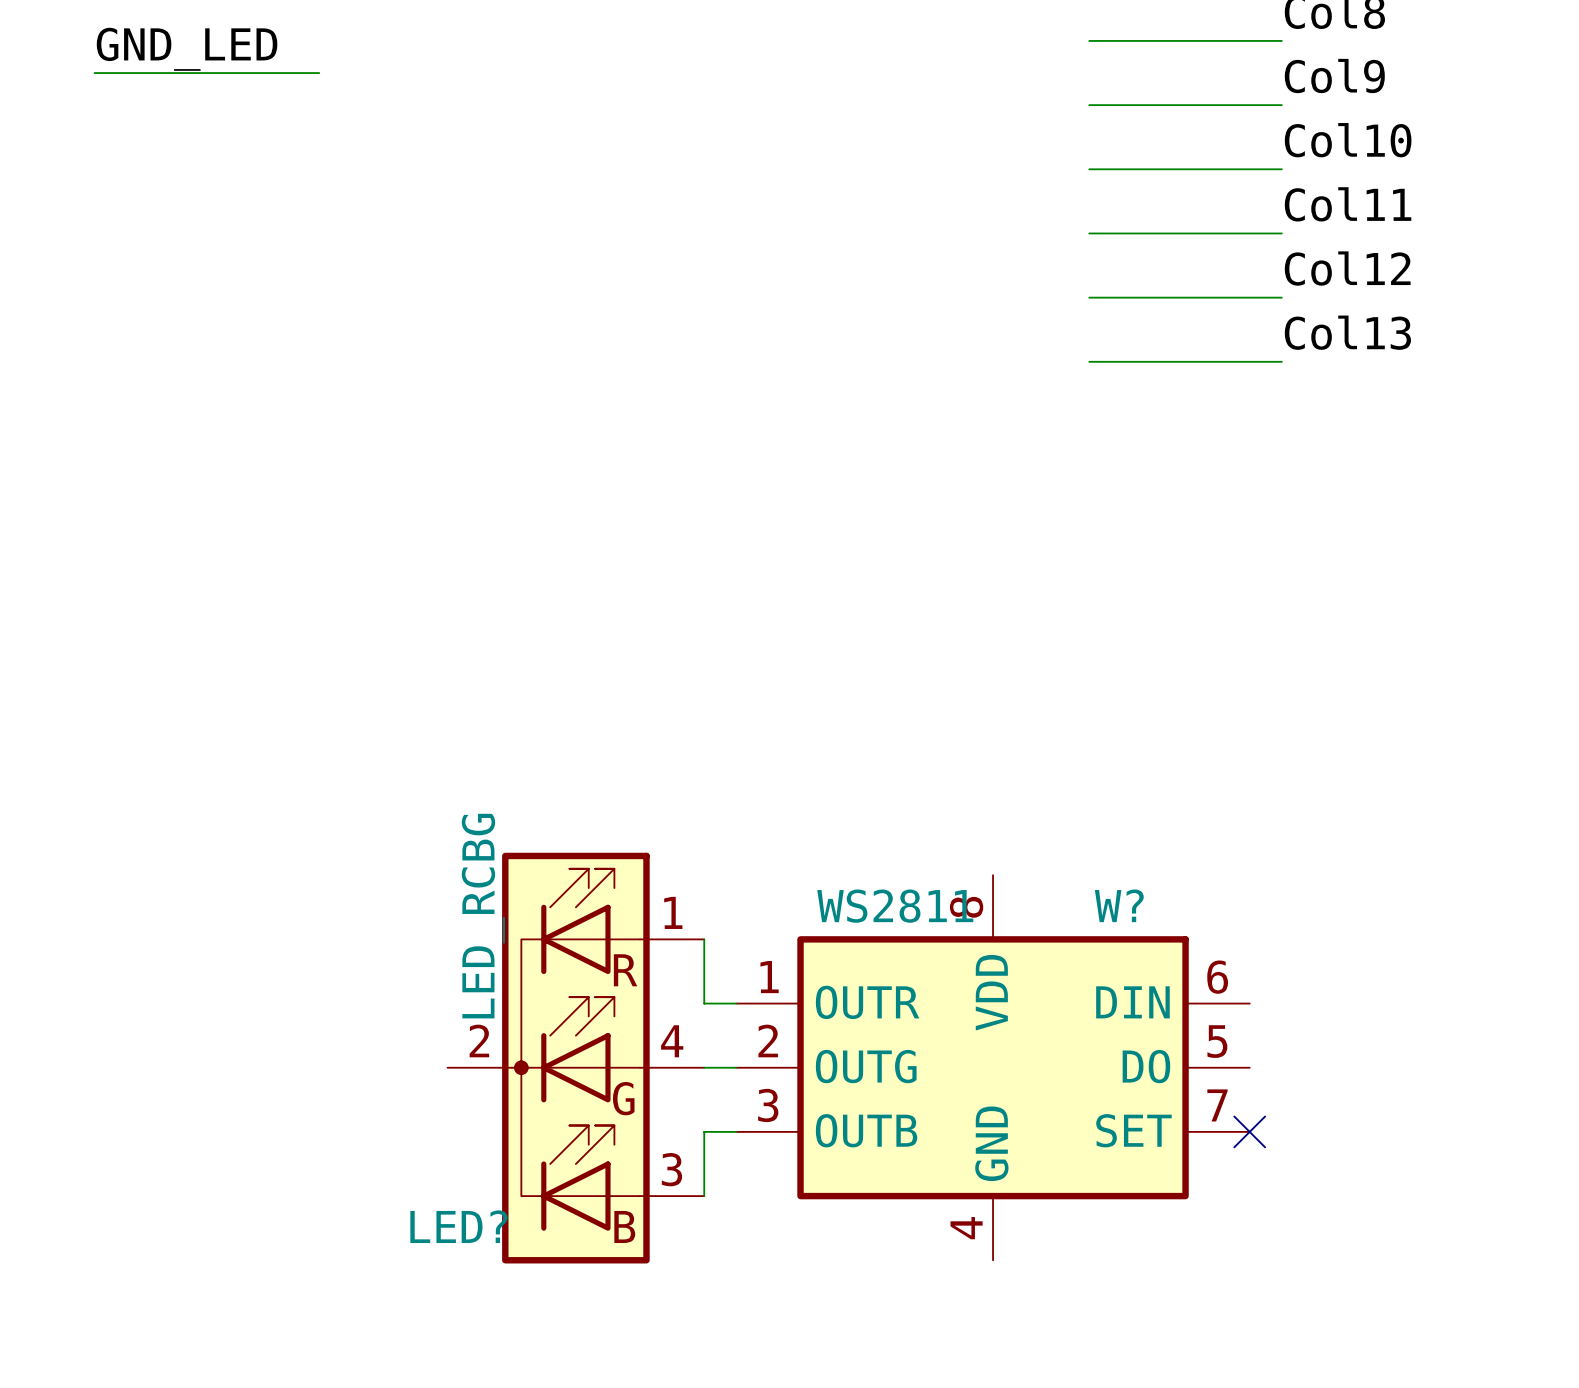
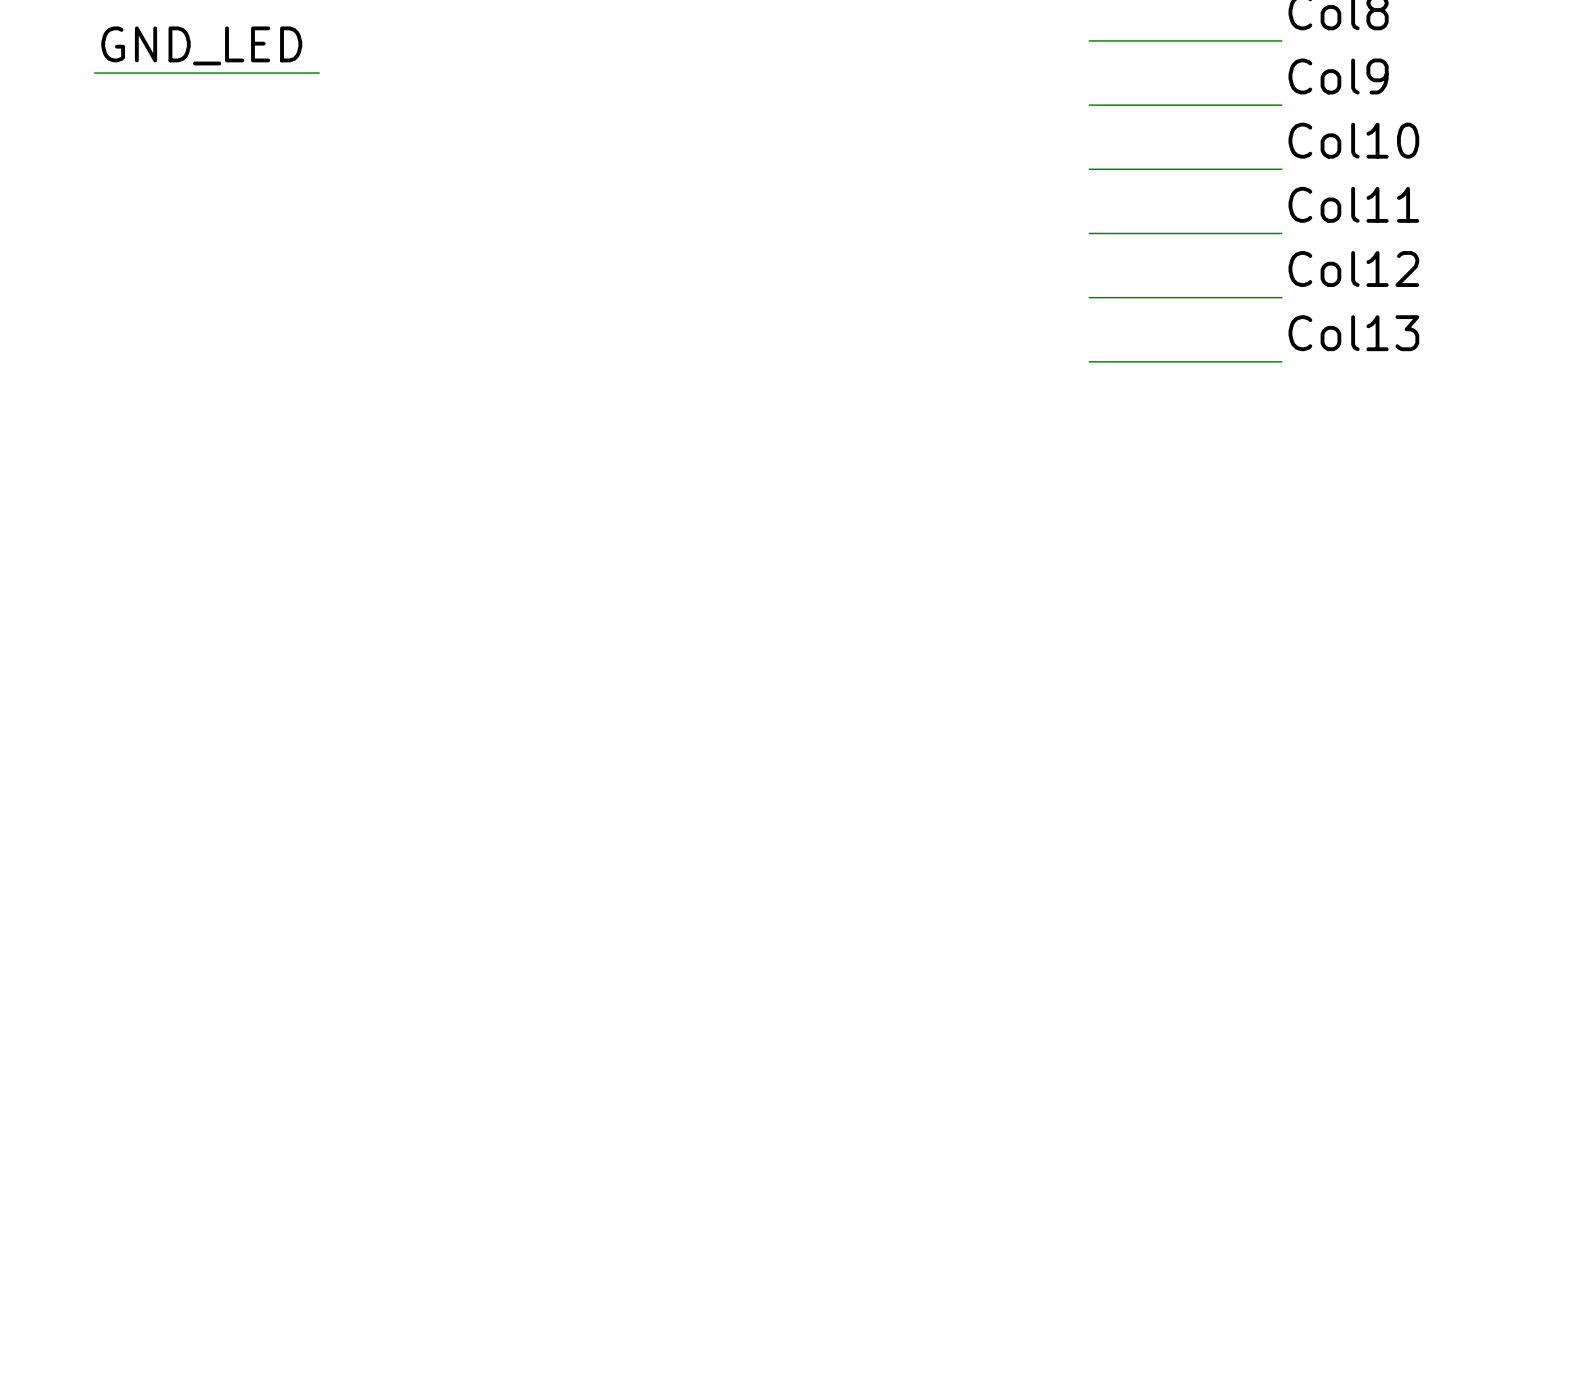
wire: (704, 939) (704, 1003) (736, 1003) -> none
LED?: LED_RCBG (575, 1058) -> none
wire: (704, 1067) (736, 1067) -> none
W?: WS2811 (993, 1067) -> none
wire: (736, 1131) (704, 1131) (704, 1196) -> none
no-connect mark: (1249, 1131) -> none

